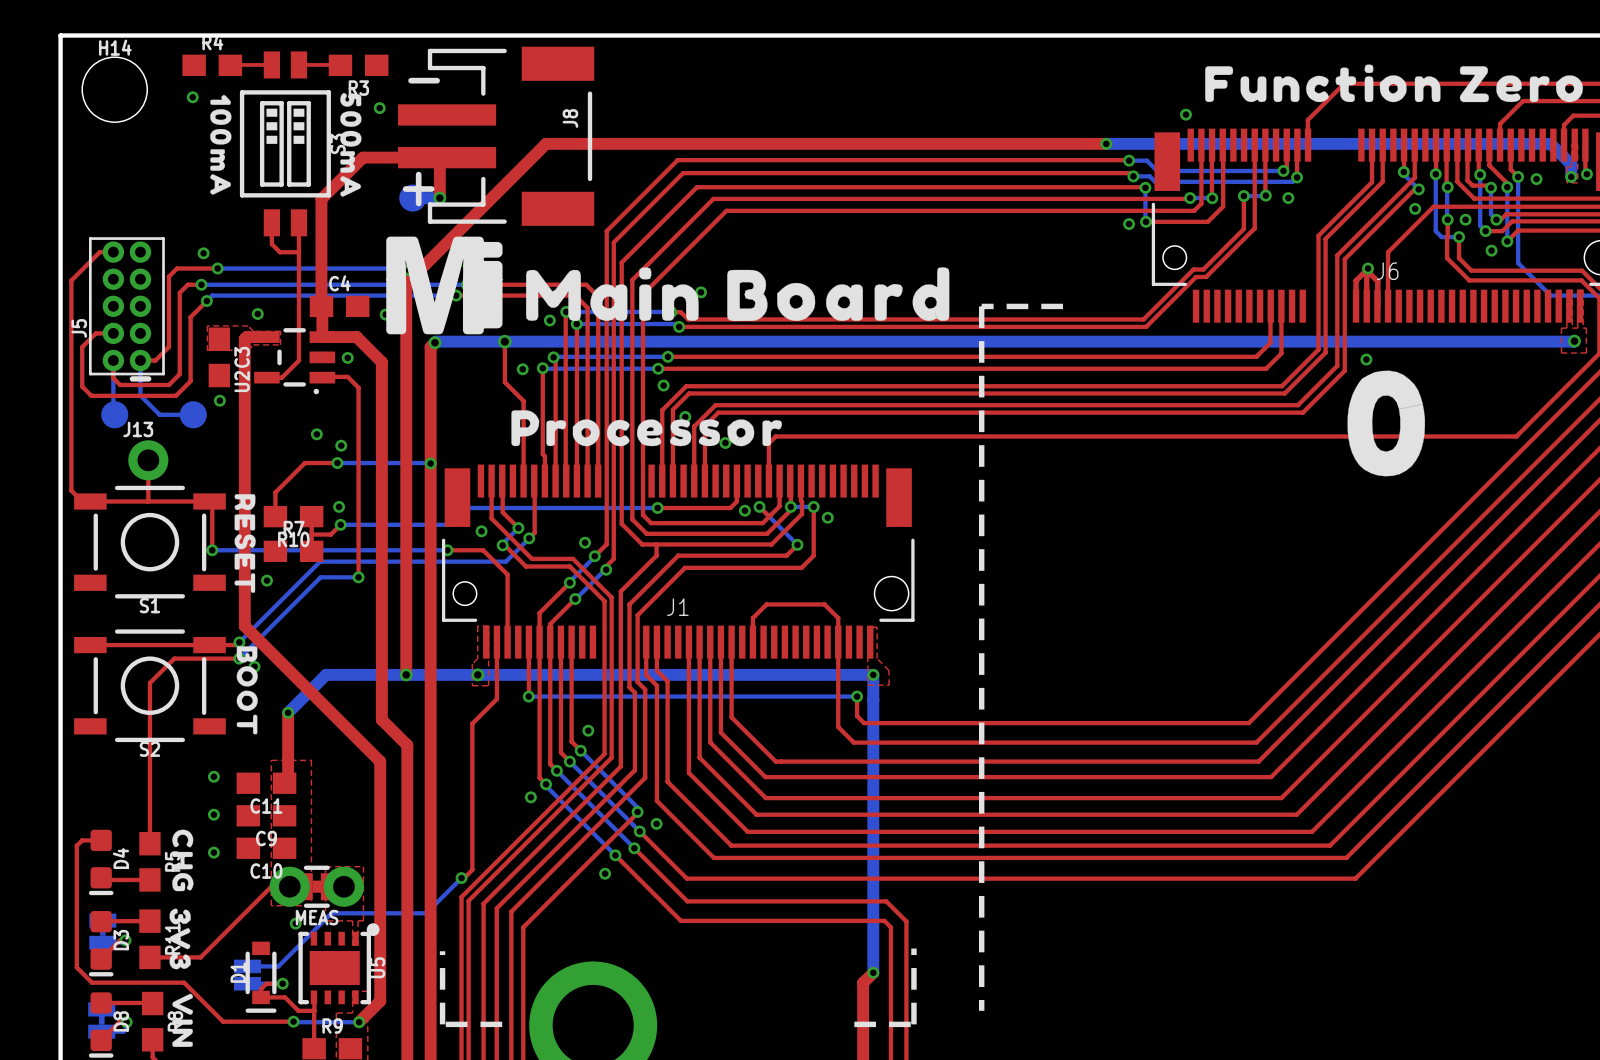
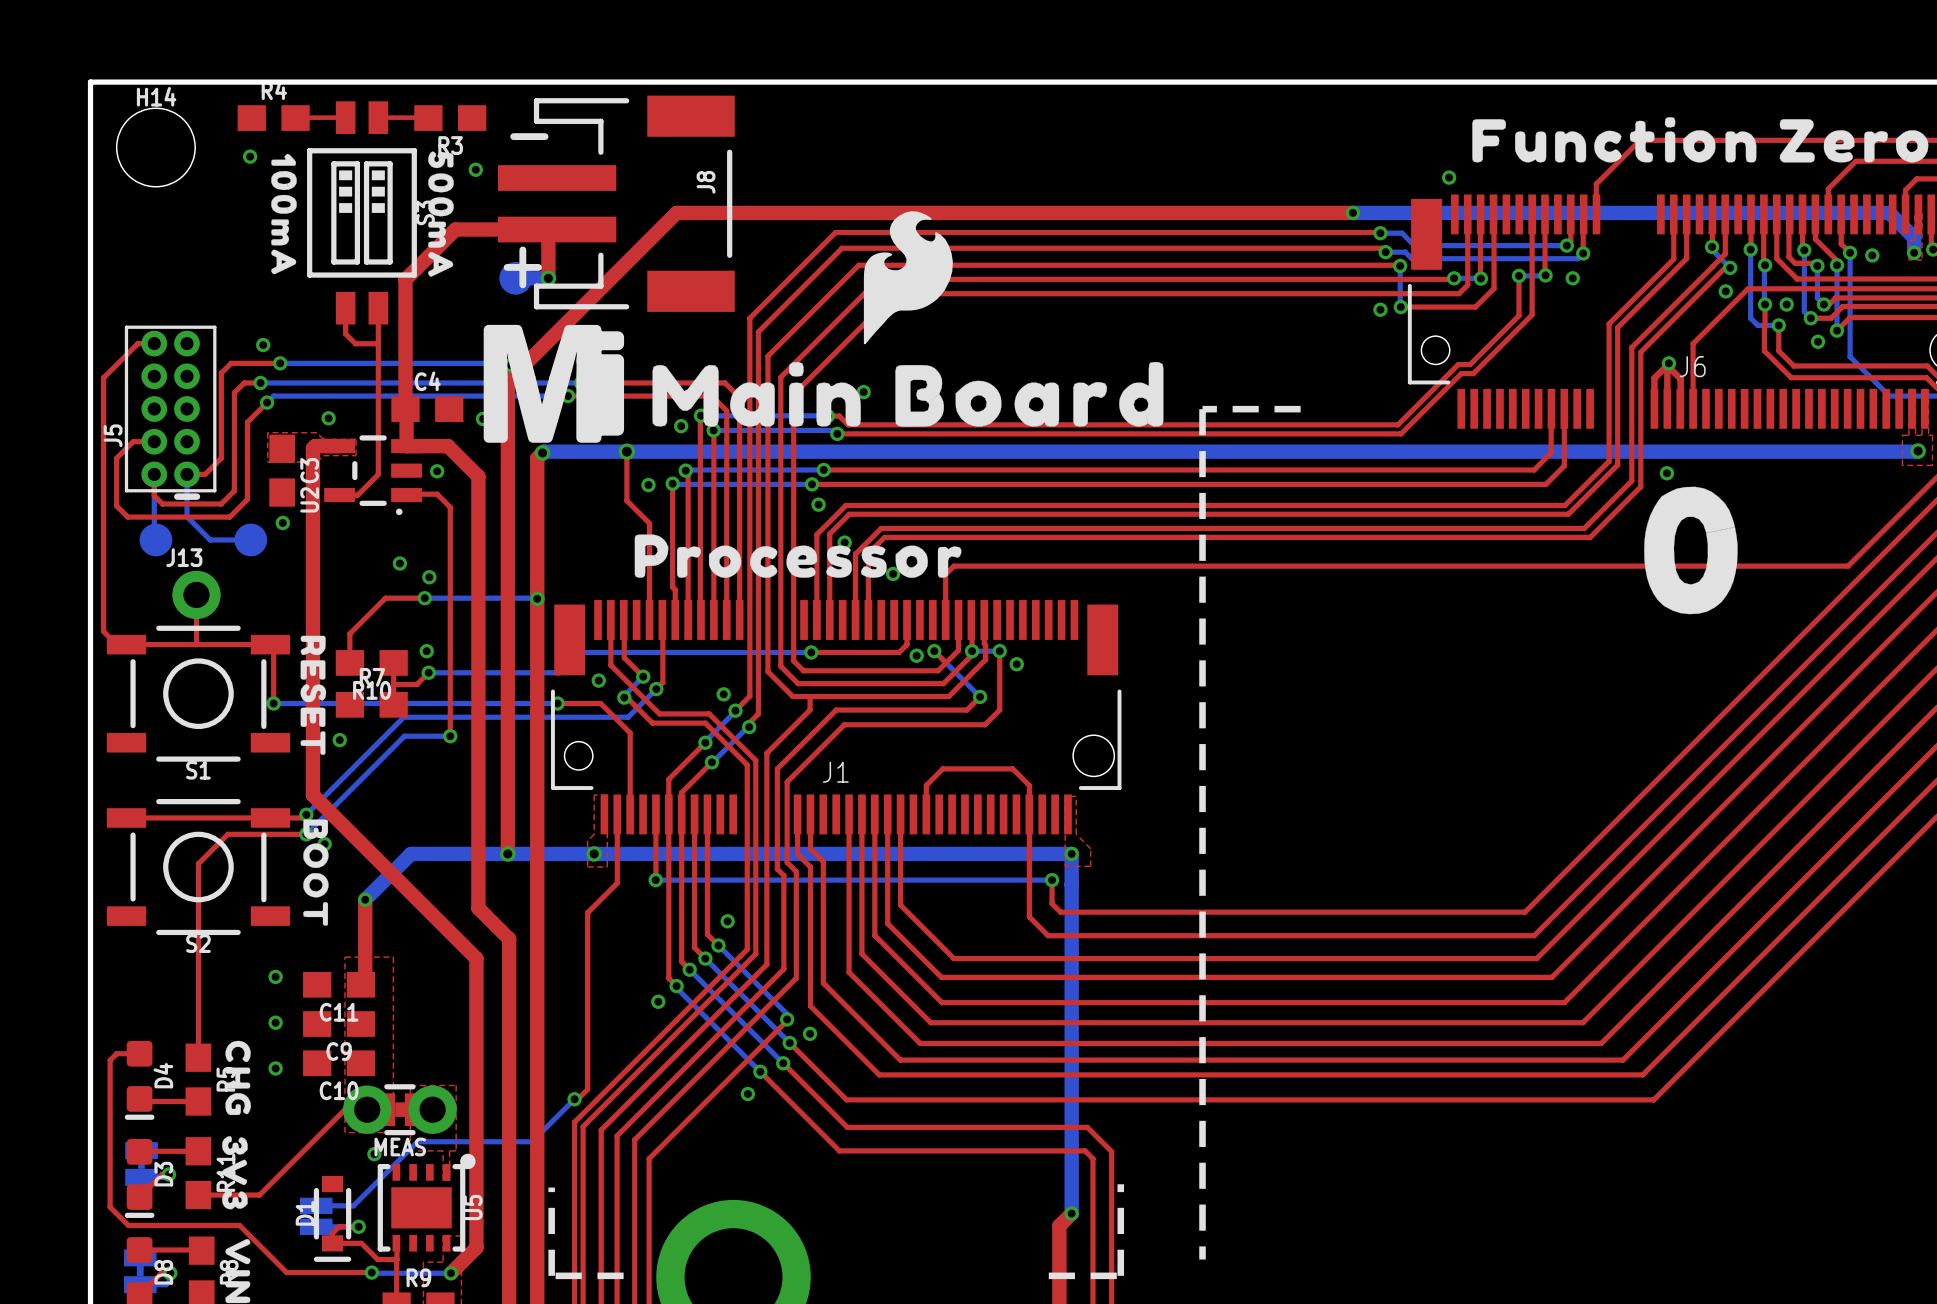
drawing: none -> [863, 211, 953, 345]

